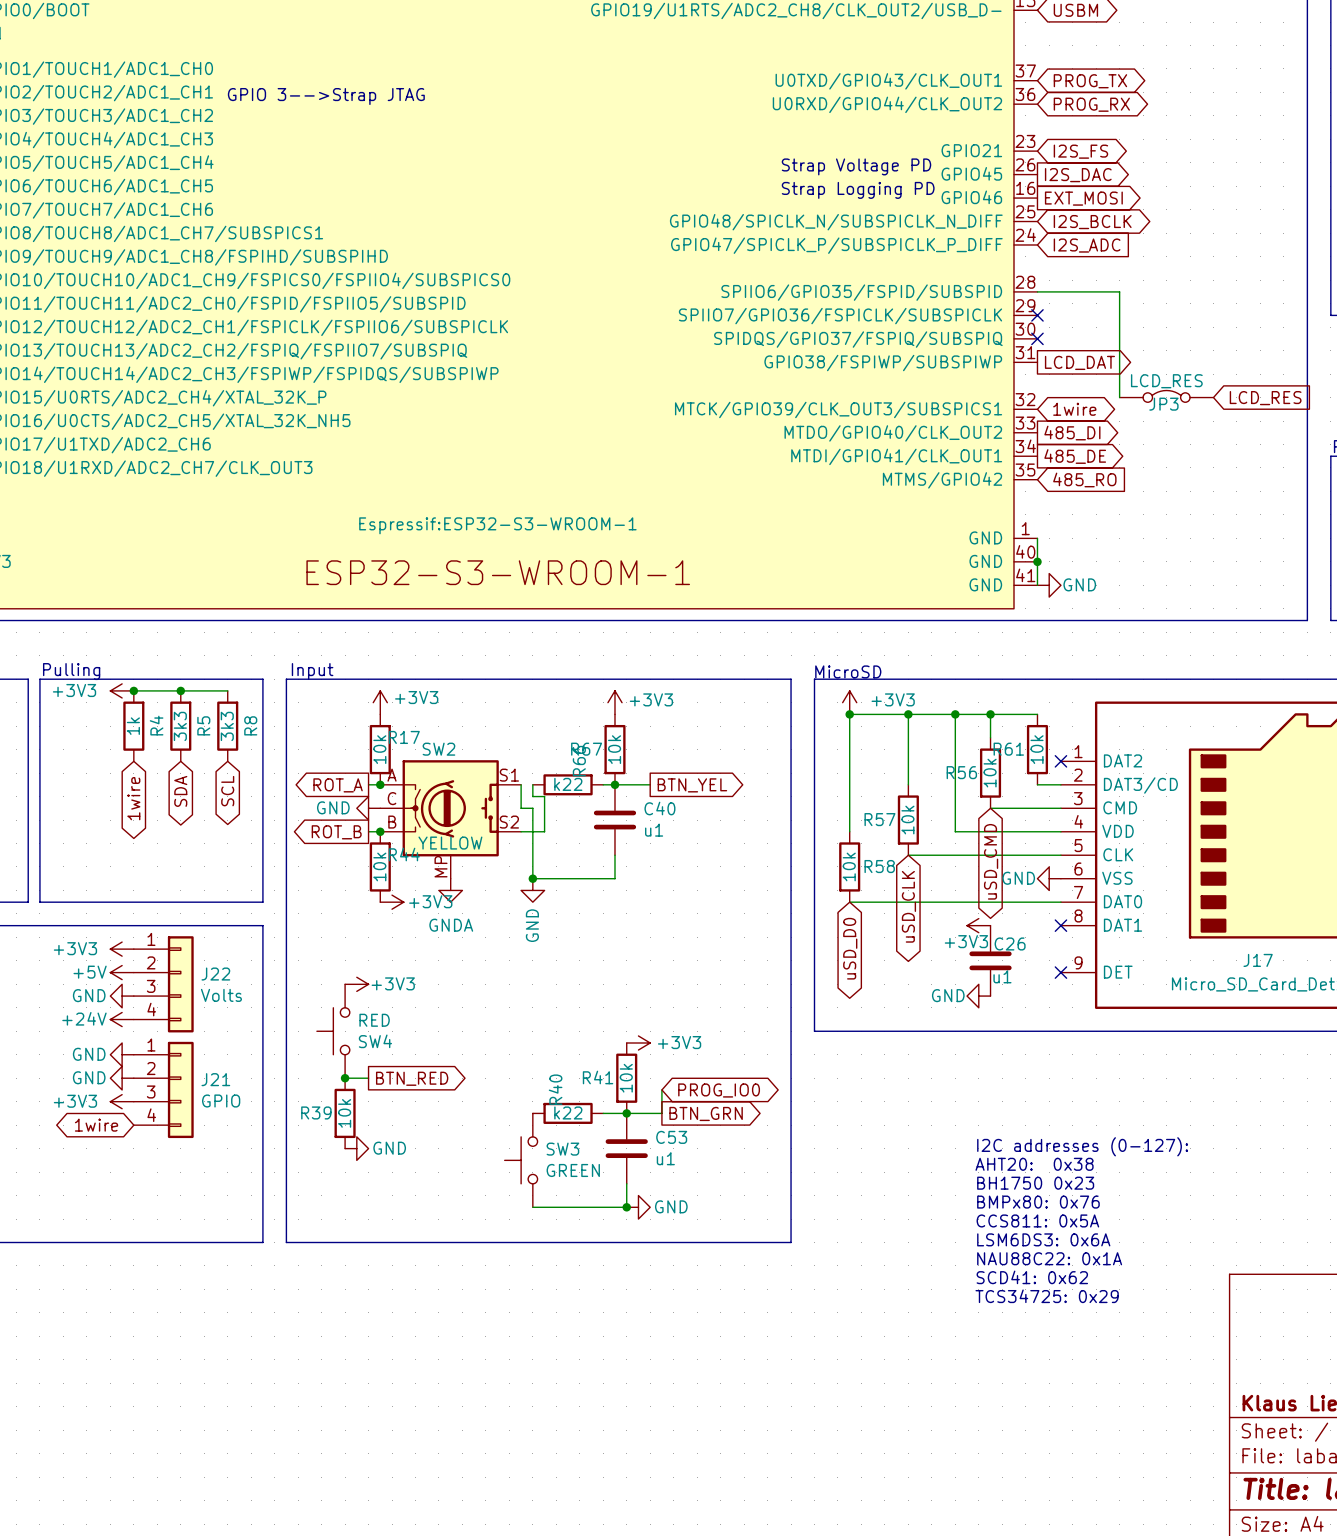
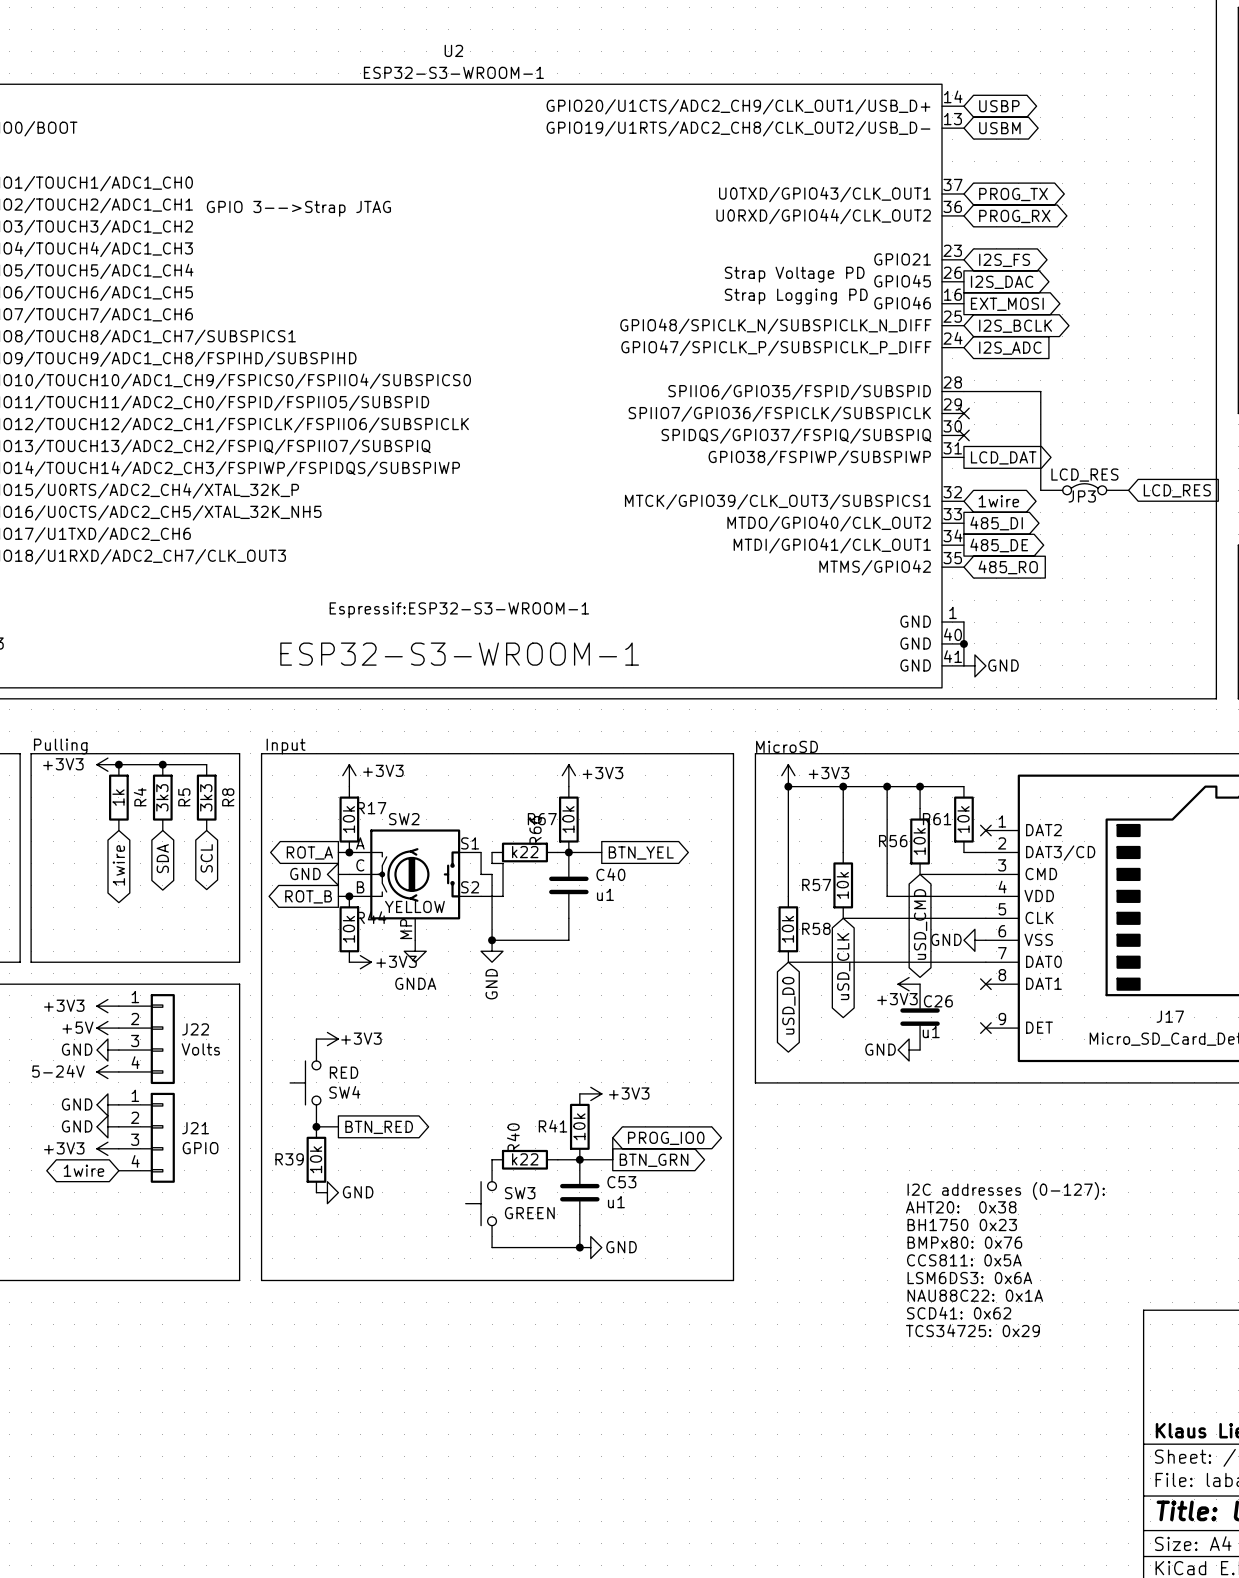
power symbol: +24V (122, 1019) -> 5-24V (107, 1071)

